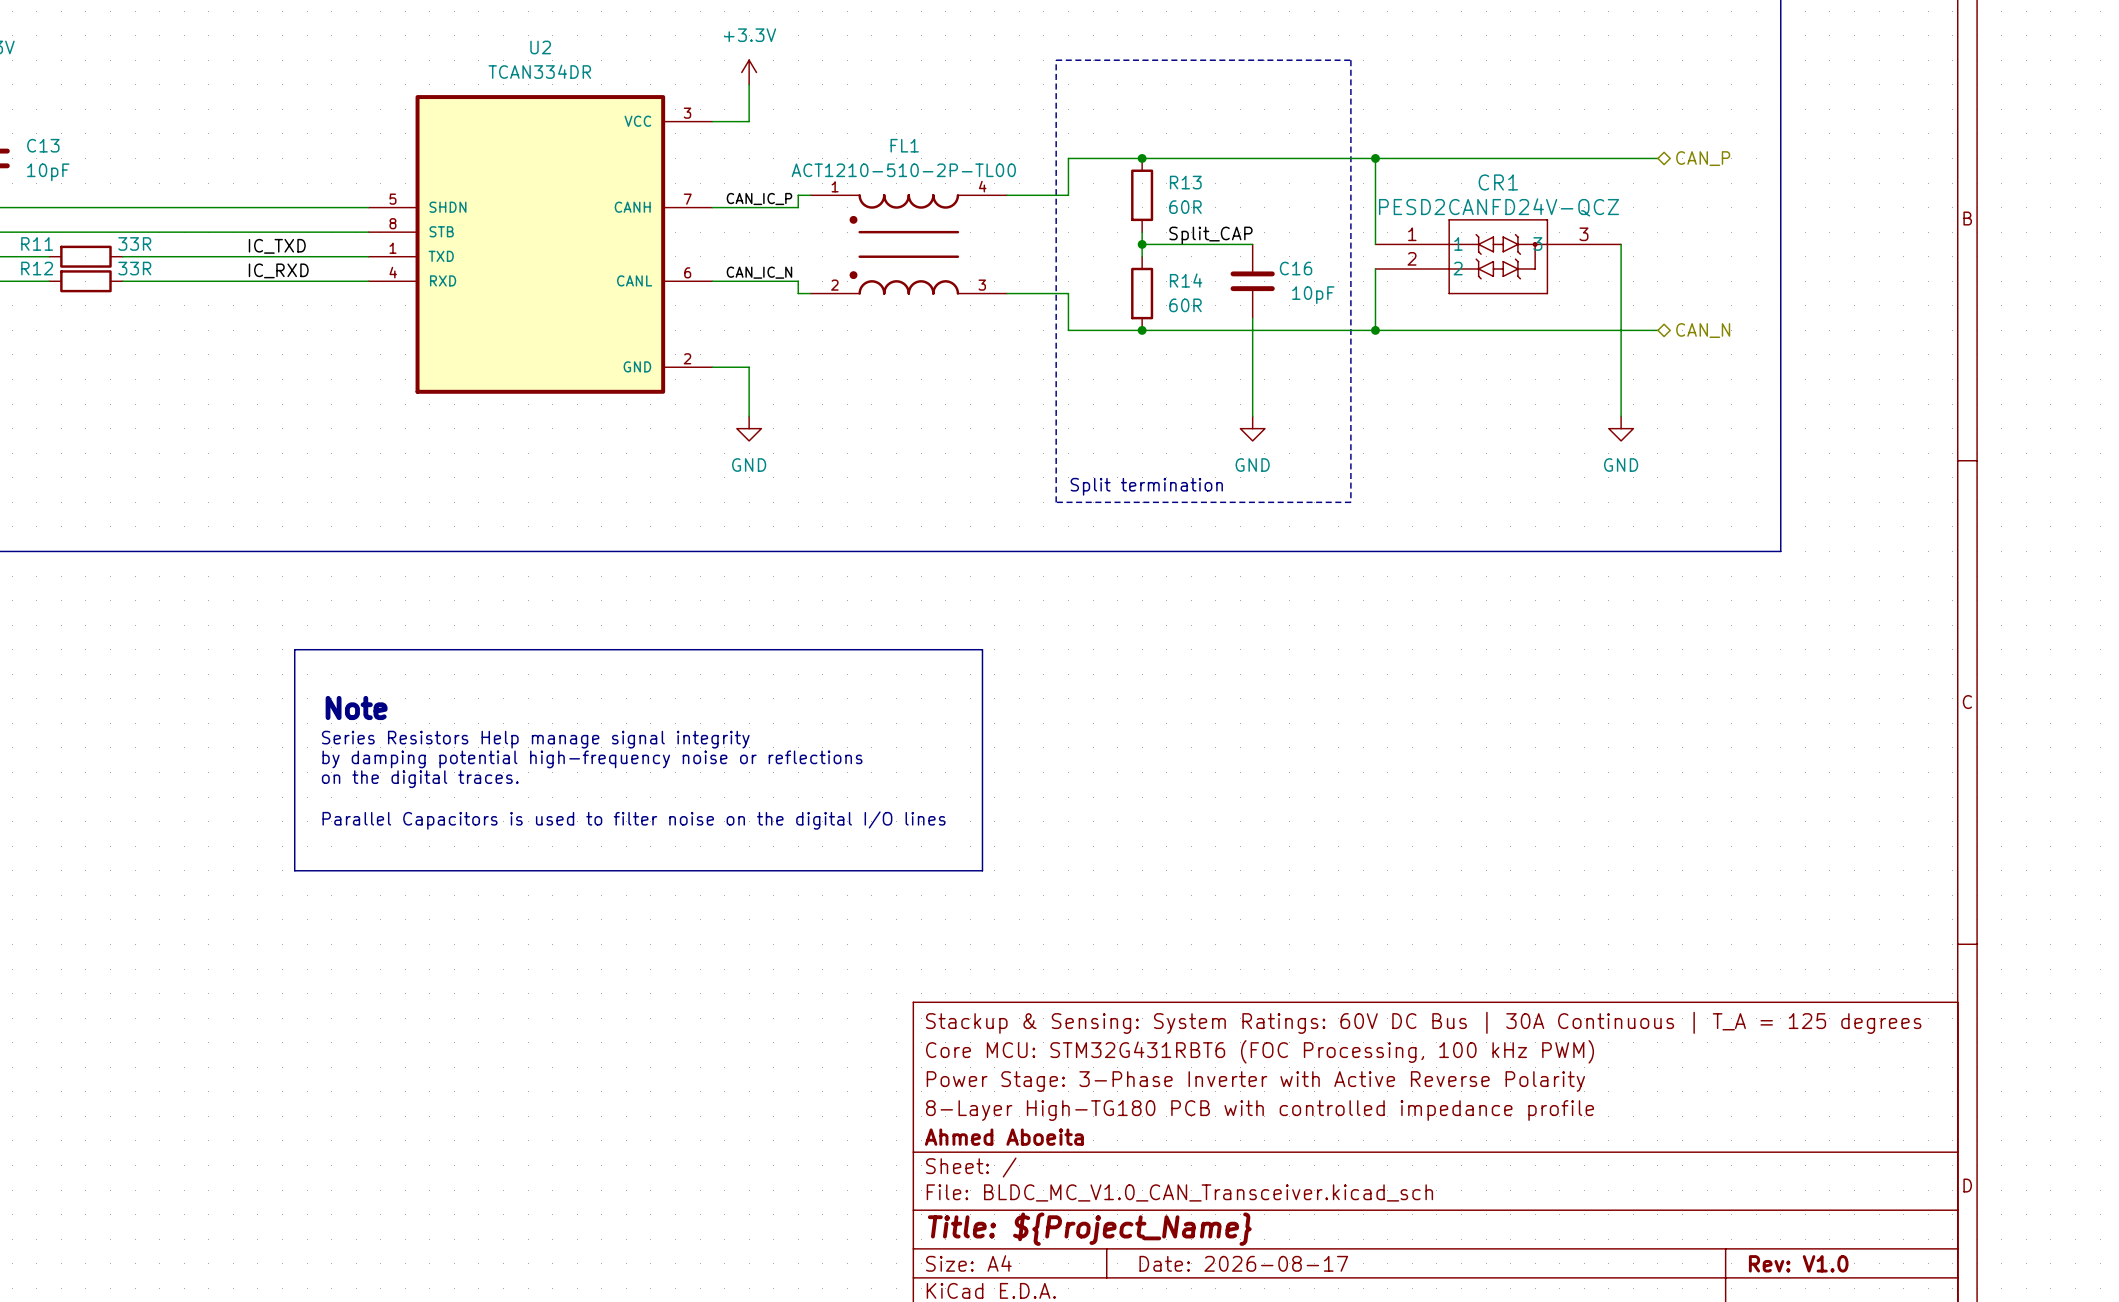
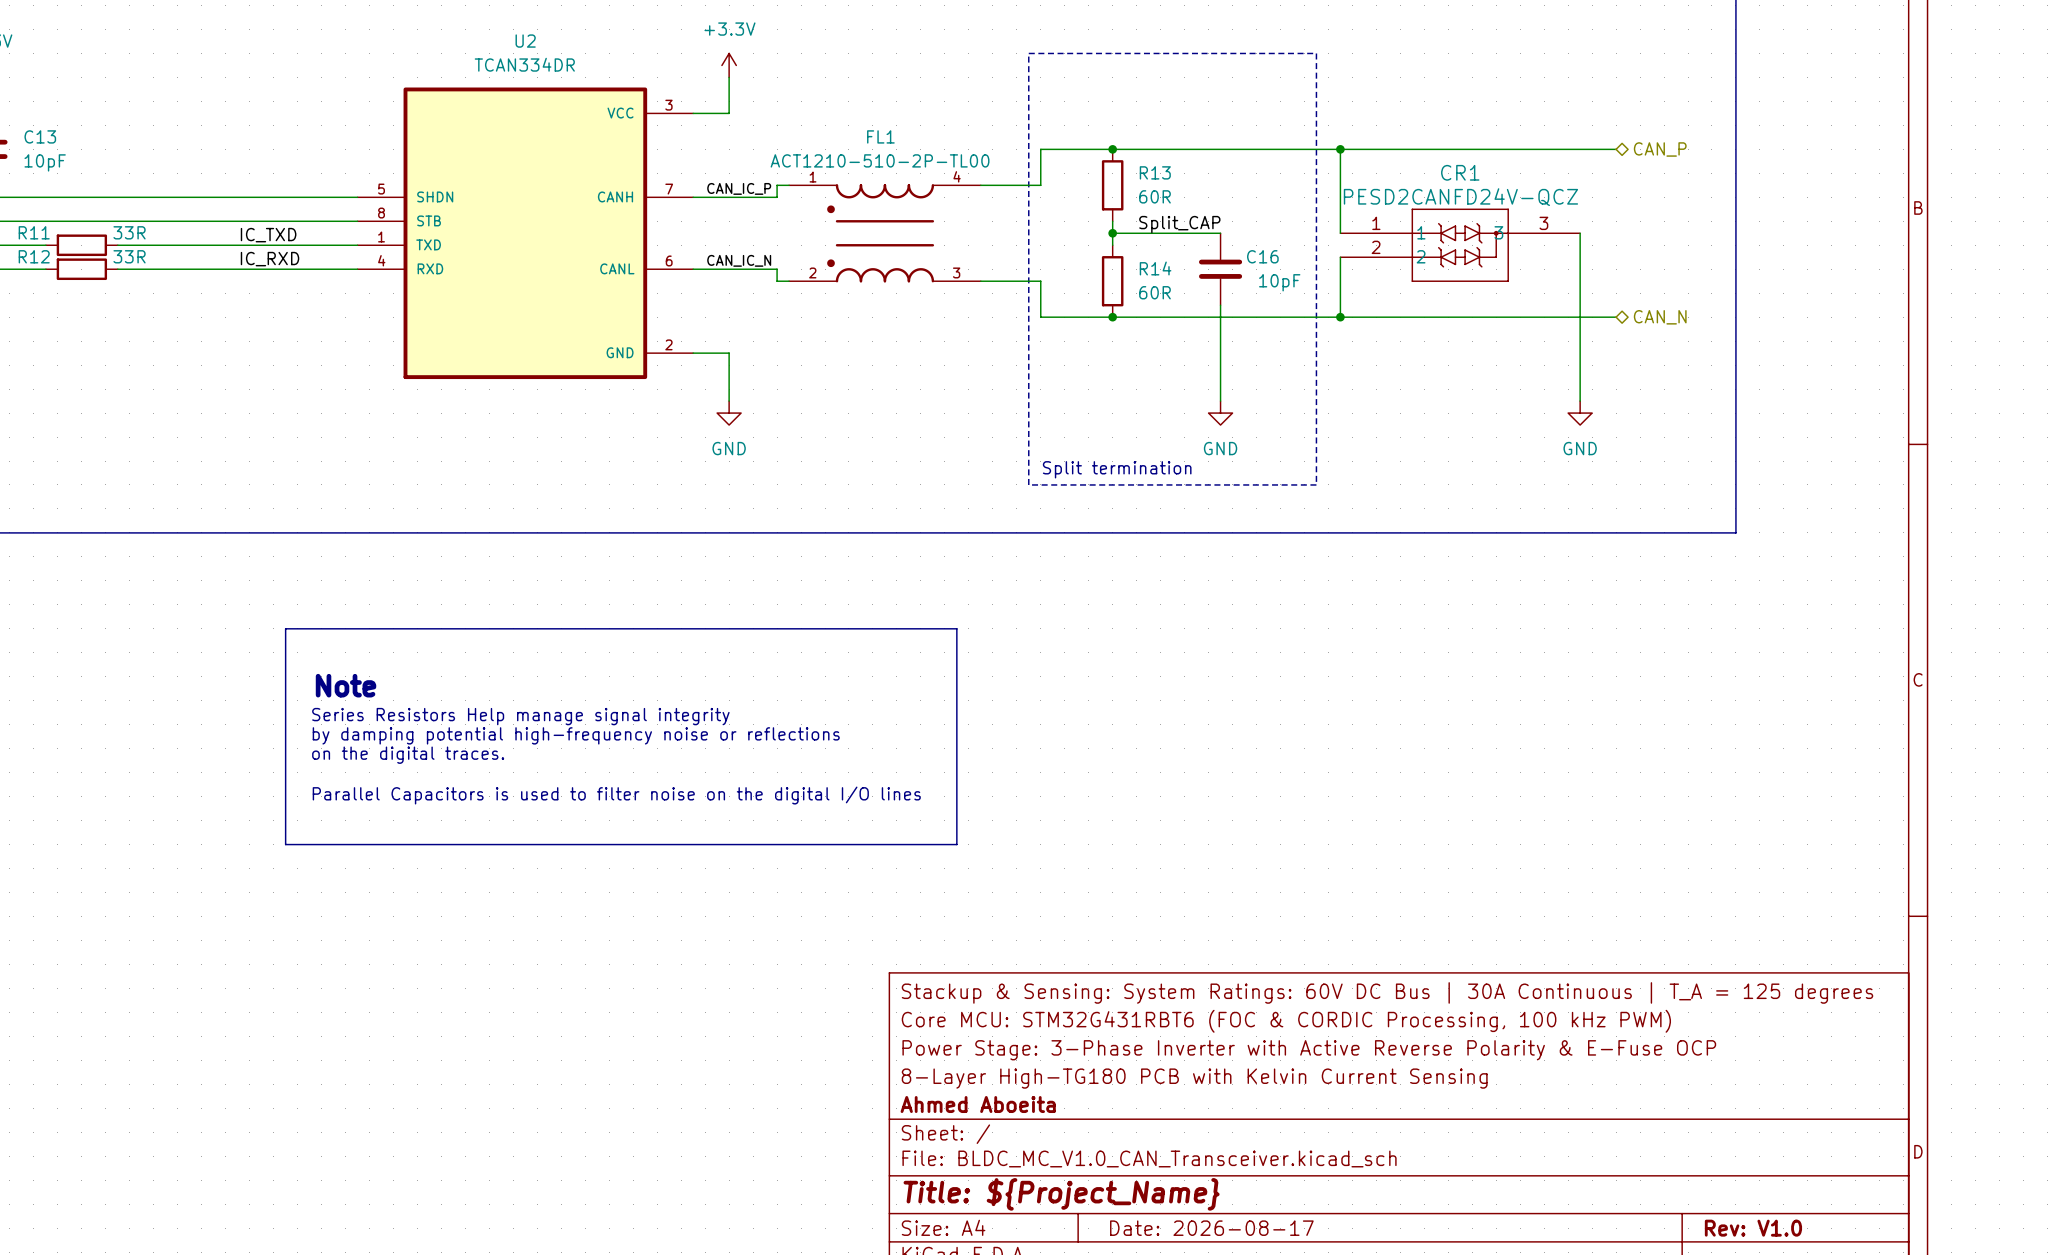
title block: Core MCU: STM32G431RBT6 (FOC Processing, 100 kHz PWM) (1260, 1051) -> Core MCU: STM32G431RBT6 (FOC & CORDIC Processing, 100 kHz PWM) (1286, 1021)
title block: Power Stage: 3-Phase Inverter with Active Reverse Polarity (1255, 1081) -> Power Stage: 3-Phase Inverter with Active Reverse Polarity & E-Fuse OCP (1309, 1050)
title block: 8-Layer High-TG180 PCB with controlled impedance profile (1260, 1110) -> 8-Layer High-TG180 PCB with Kelvin Current Sensing (1194, 1078)

